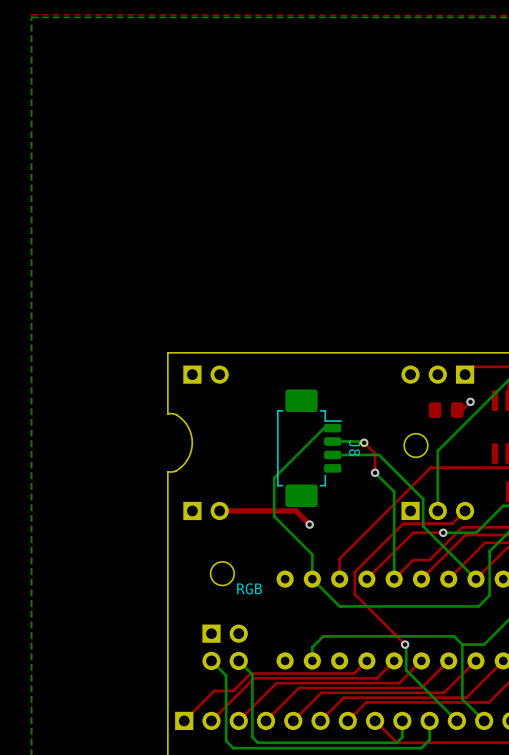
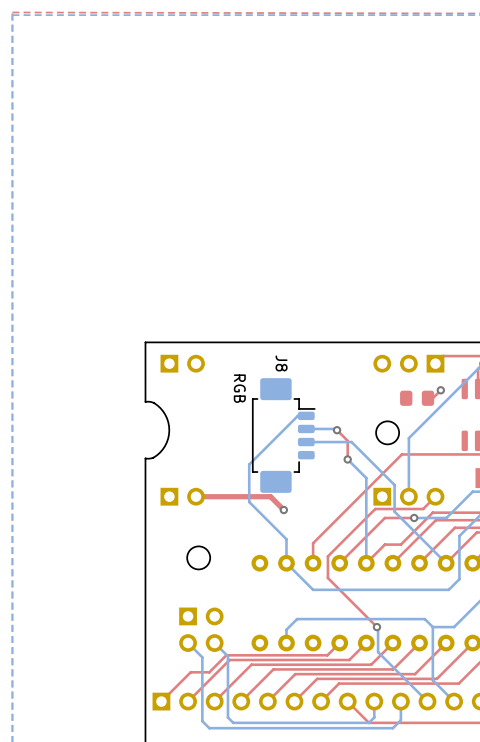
J8 name position: J8 (354, 448) -> J8 (281, 363)
text rotation: 0° (249, 588) -> 90° clockwise (239, 388)
text position: RGB (249, 588) -> RGB (239, 388)

